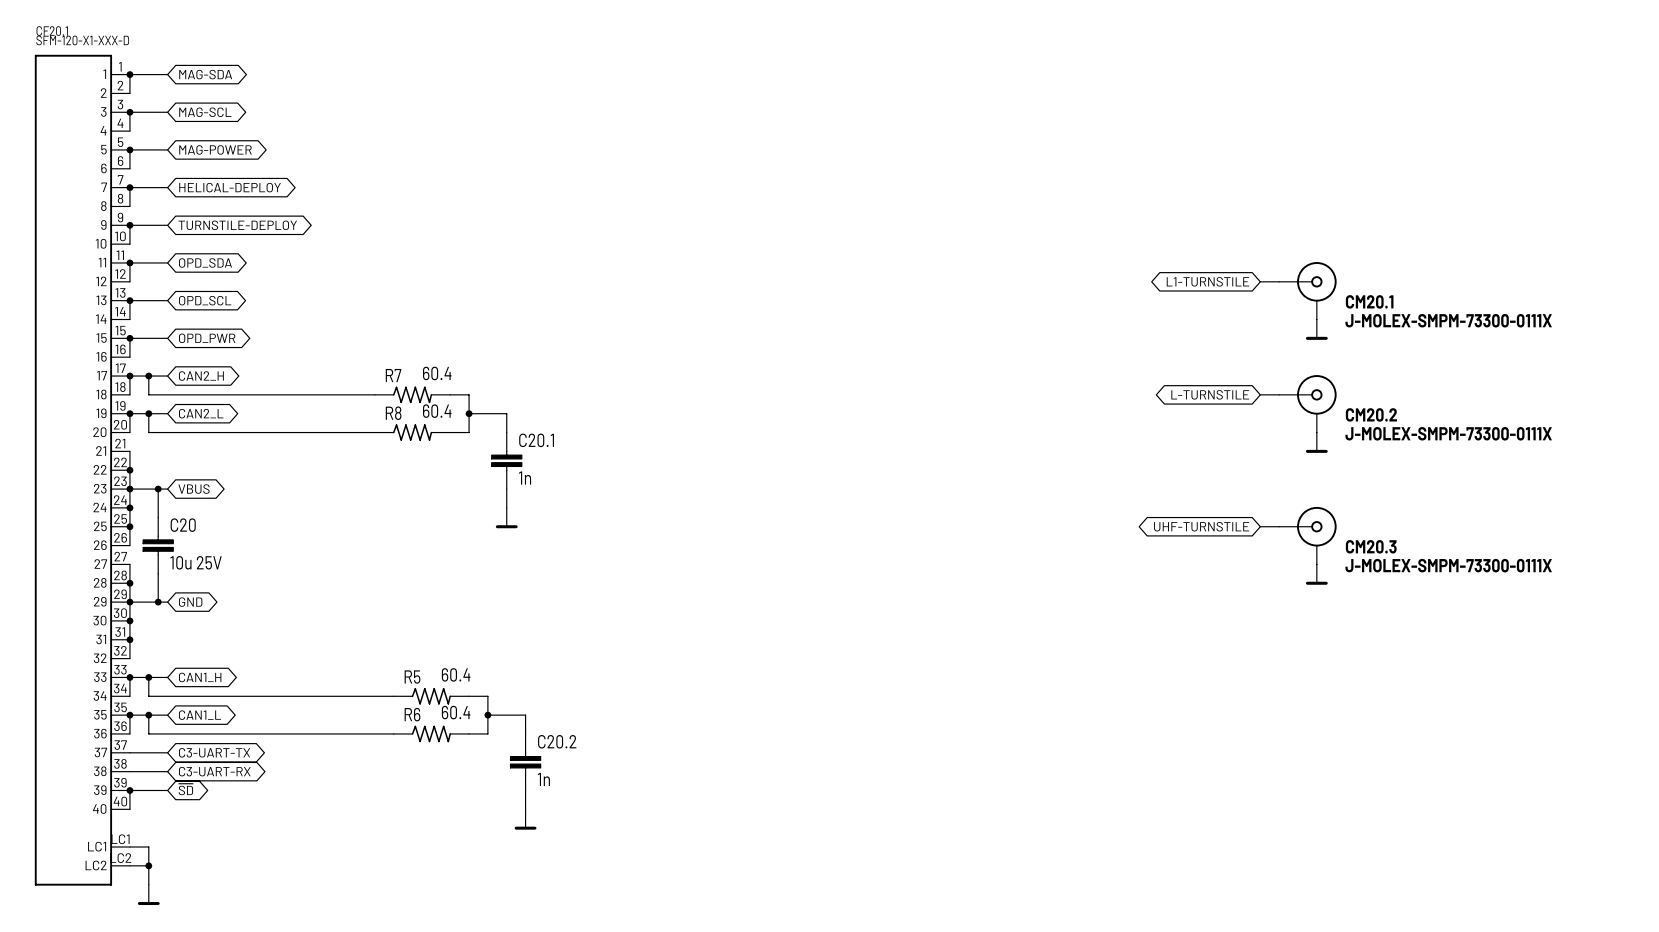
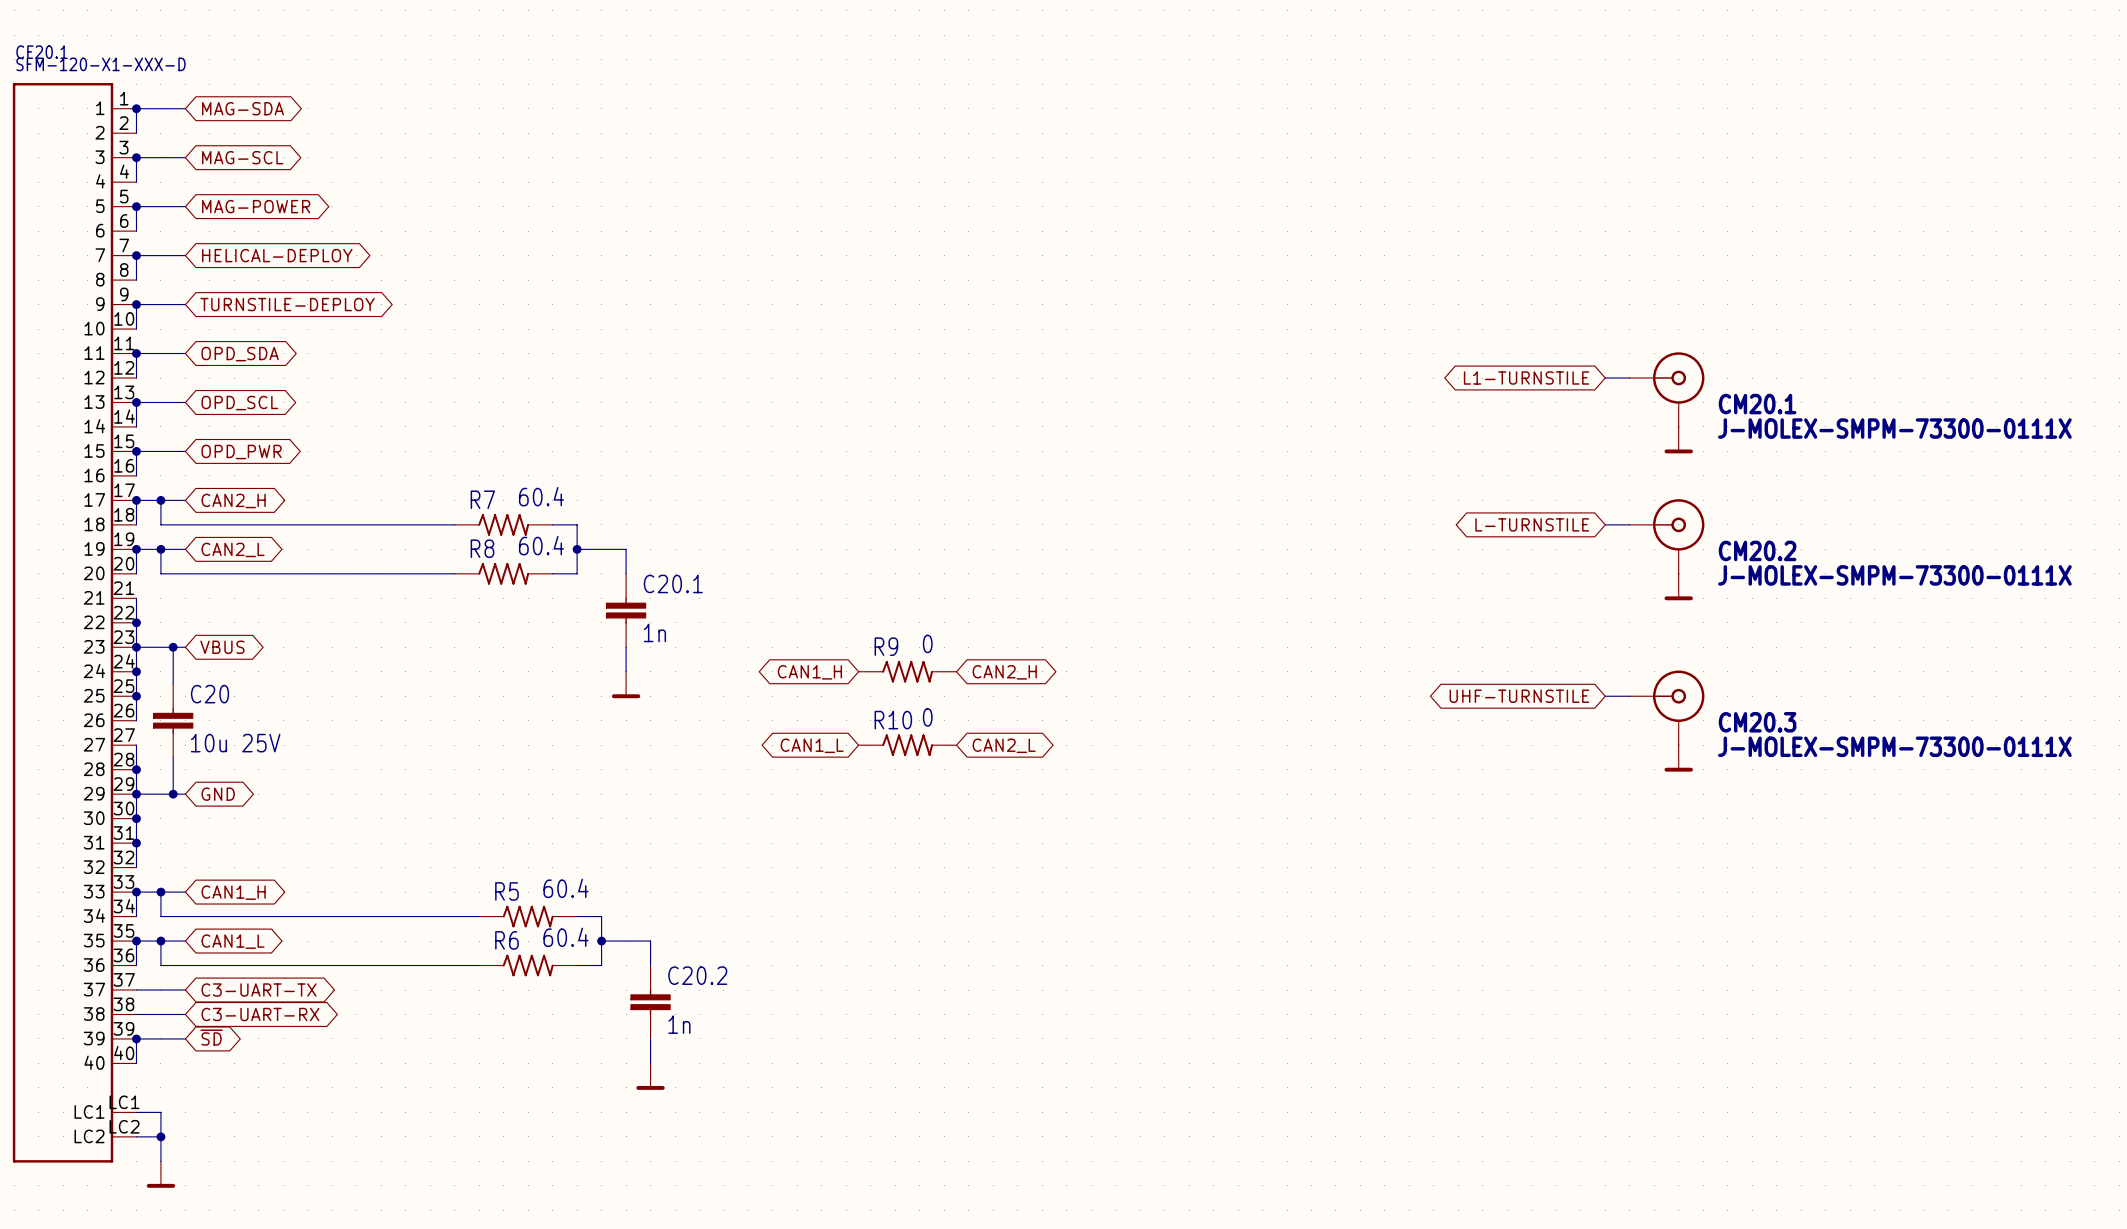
global label: none -> CAN1_H (809, 672)
R9: none -> 0 (907, 671)
global label: none -> CAN2_H (1004, 672)
global label: none -> CAN1_L (812, 745)
R10: none -> 0 (907, 745)
global label: none -> CAN2_L (1004, 745)

